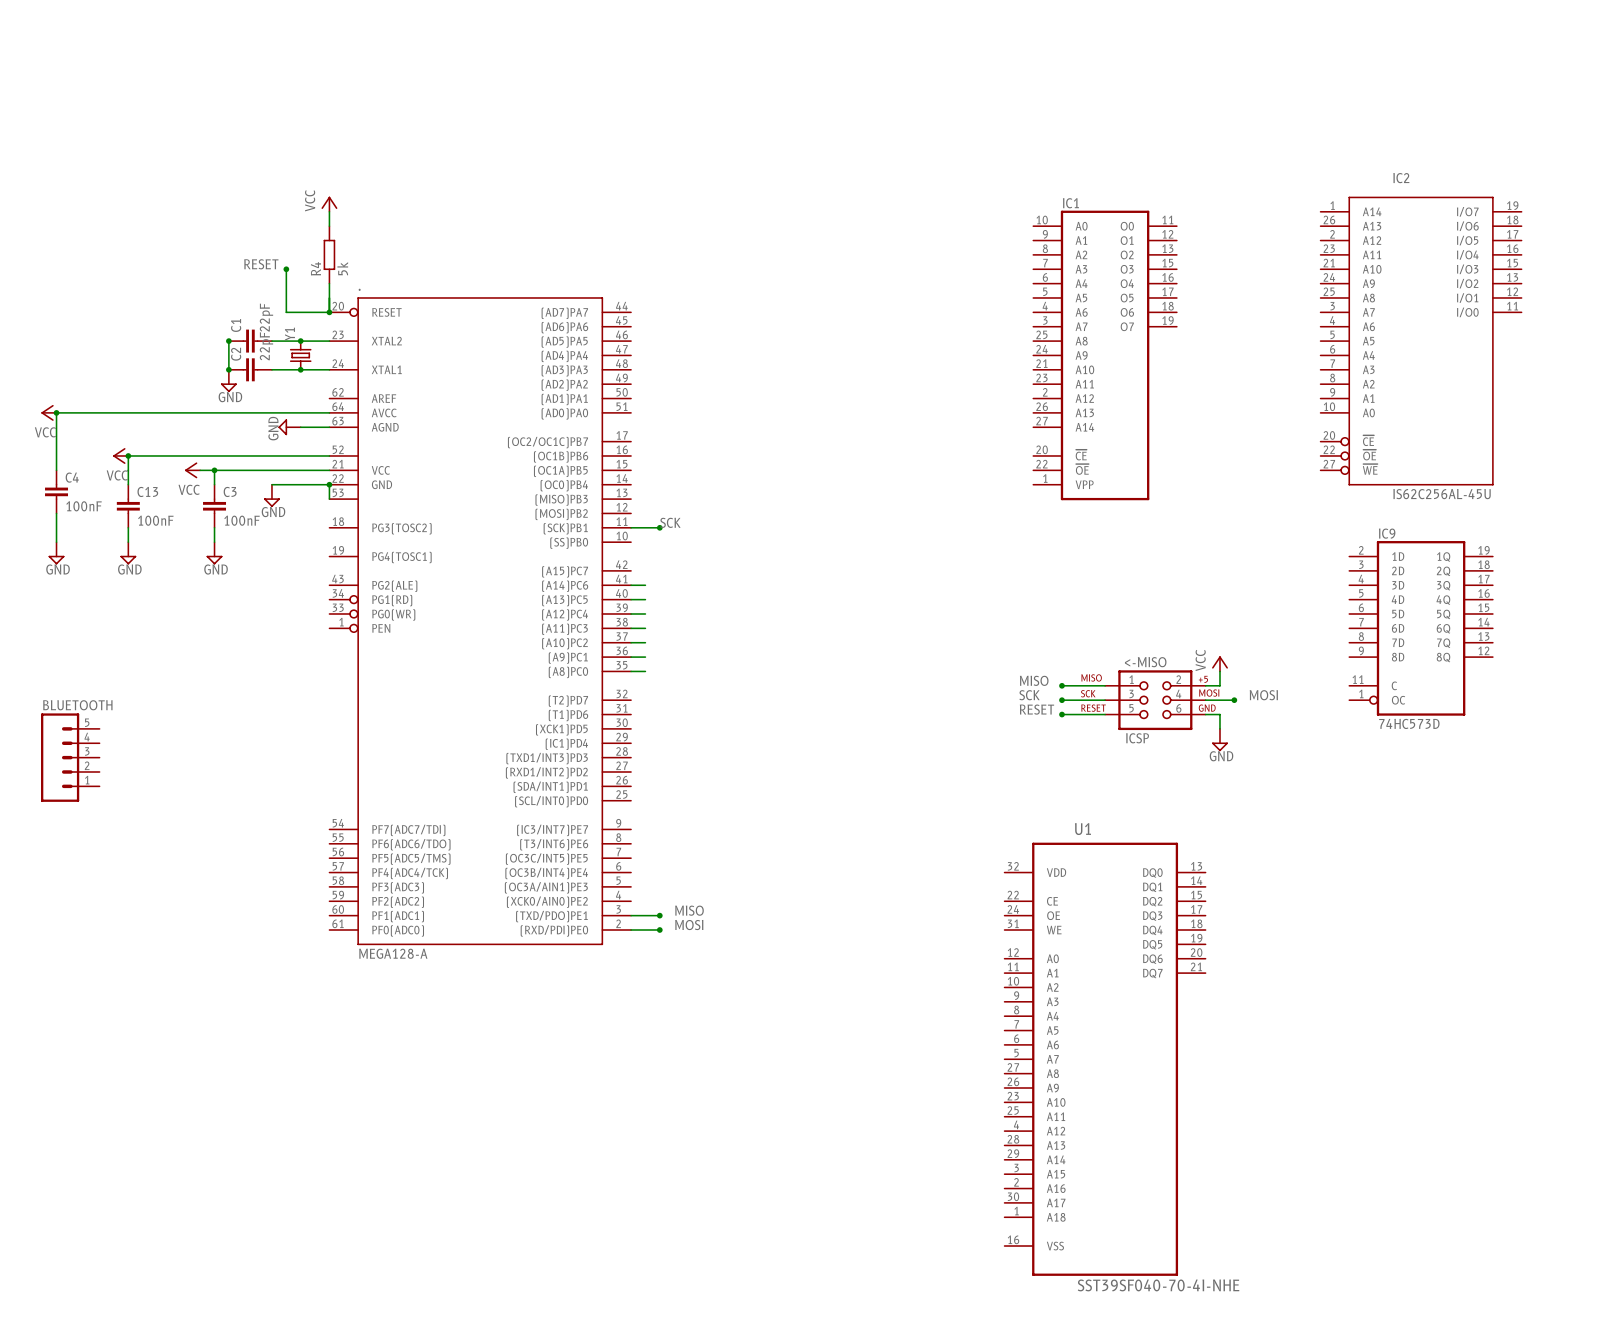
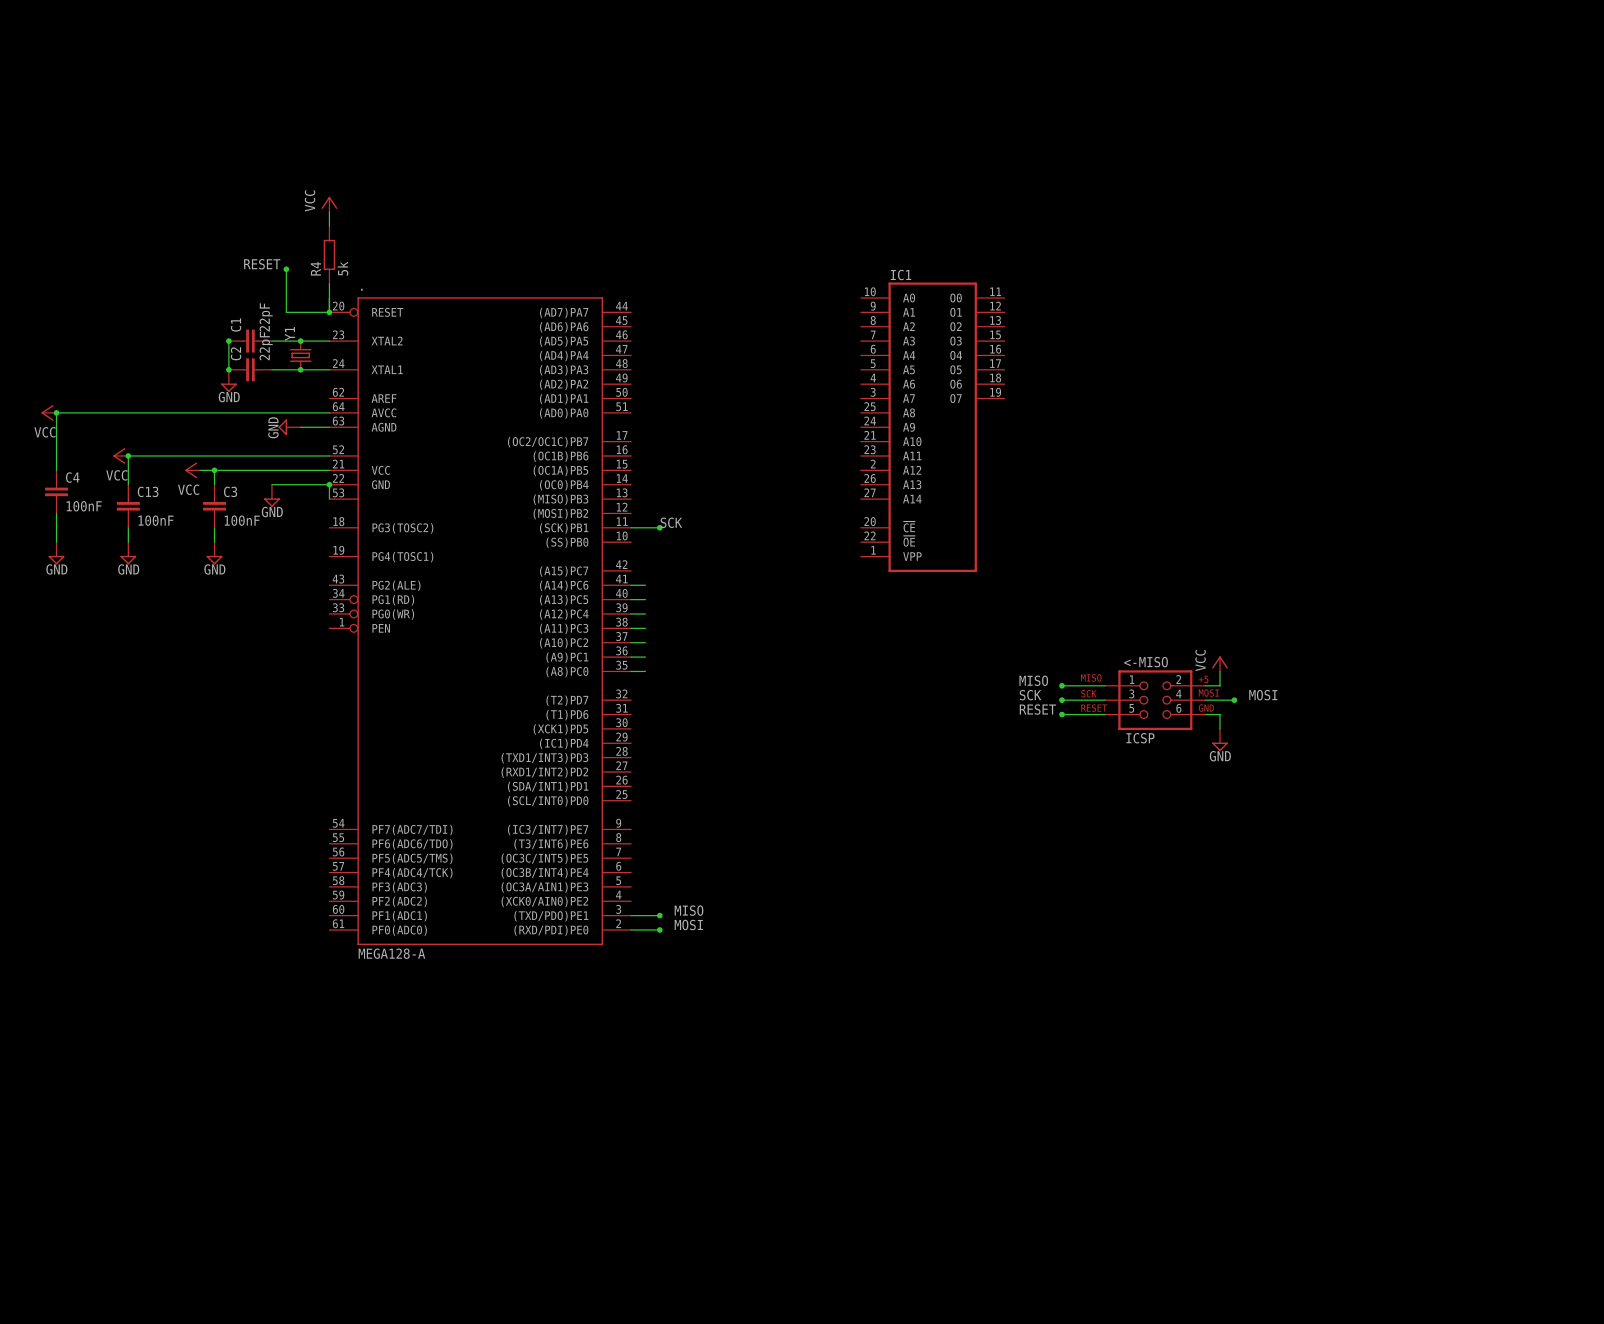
IC2: IS62C256AL-45U (1421, 341) -> none
IC1 position: (1105, 355) -> (932, 427)
IC9: 74HC573D (1421, 628) -> none
BLUETOOTH: (70, 757) -> none
U1: SST39SF040-70-4I-NHE (1105, 1059) -> none

